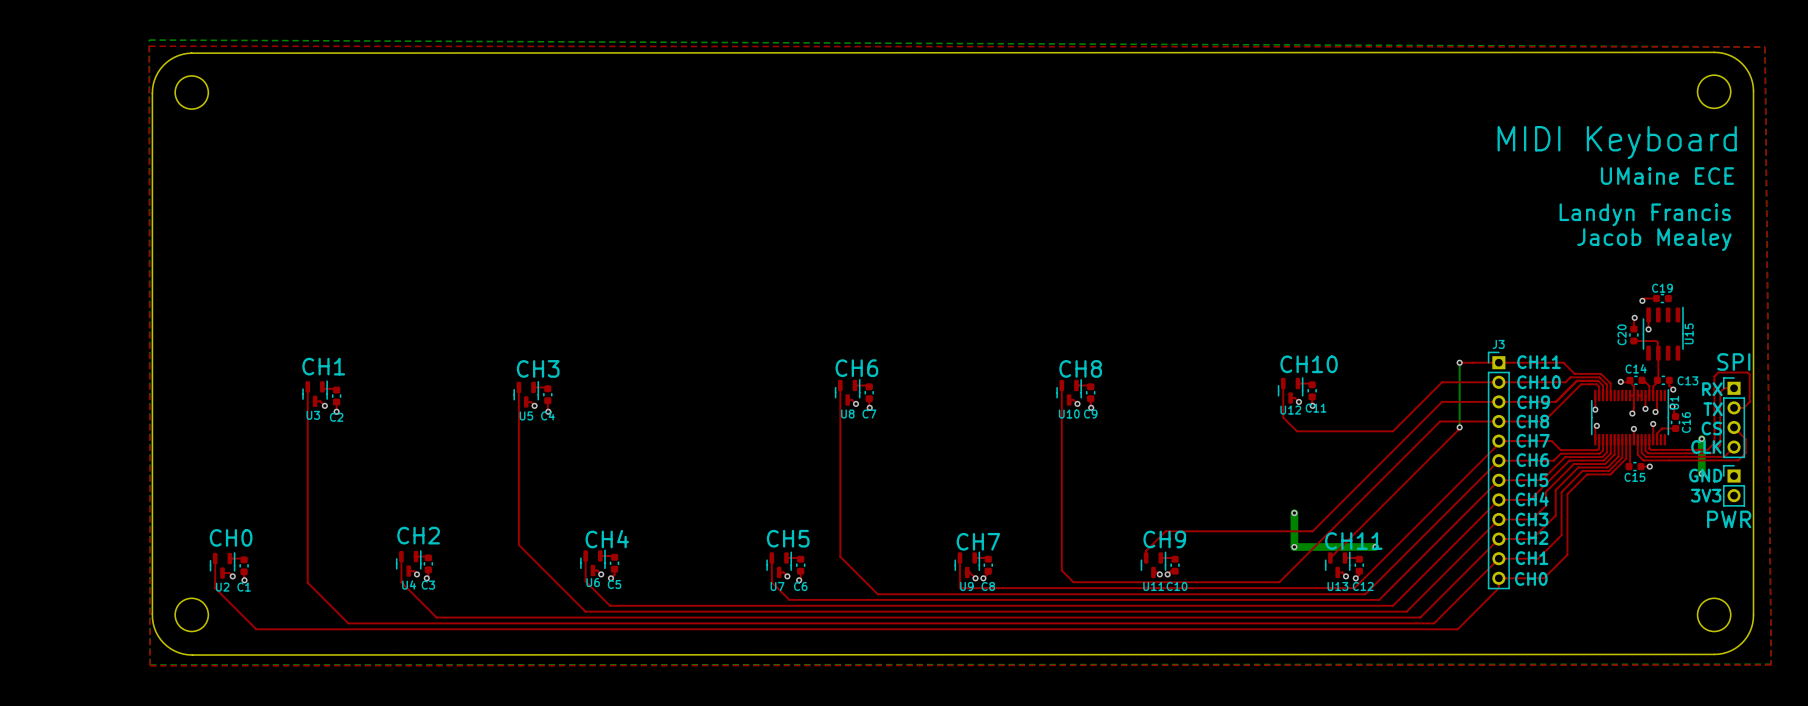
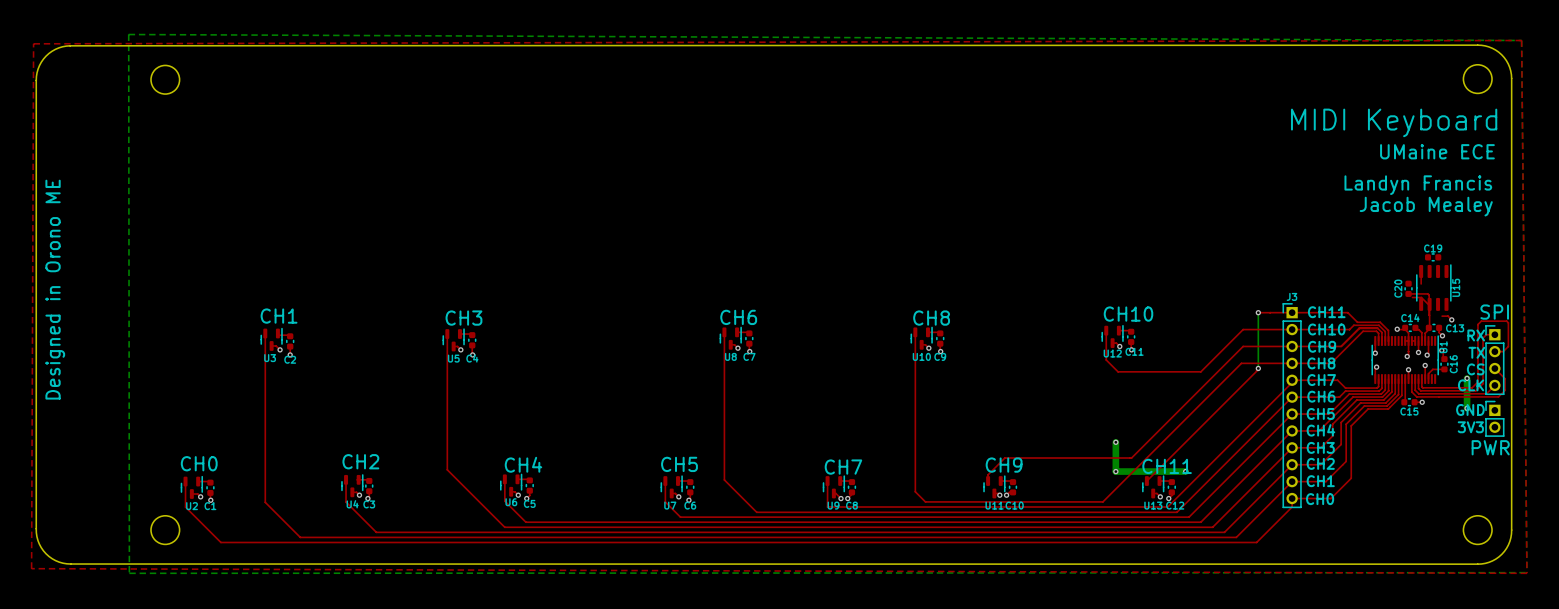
top zone outline: (1765, 46) (149, 46) (150, 665) (1771, 665) -> (1521, 40) (33, 43) (31, 568) (1526, 573)
board edge: (1714, 52) (191, 53) (178, 55) (163, 65) (154, 80) (152, 93) (152, 618) (154, 627) (160, 639) (167, 646) (179, 652) (192, 655) (1714, 654) -> (1477, 45) (70, 45) (55, 49) (46, 56) (38, 69) (36, 80) (36, 532) (43, 550) (59, 562) (70, 564) (1477, 564)
top track: (1656, 298) (1644, 298) (1642, 300) -> none
via: (1642, 300) -> none
top track: (1634, 317) (1633, 329) -> none
via: (1634, 317) -> none
via: (1648, 329) -> none
text: none -> Designed in Orono ME (55, 289)
top track: none -> (1412, 297) (1421, 297) (1429, 305) (1429, 315)
top track: none -> (1442, 316) (1448, 316) (1451, 319)
via: none -> (1451, 319)

